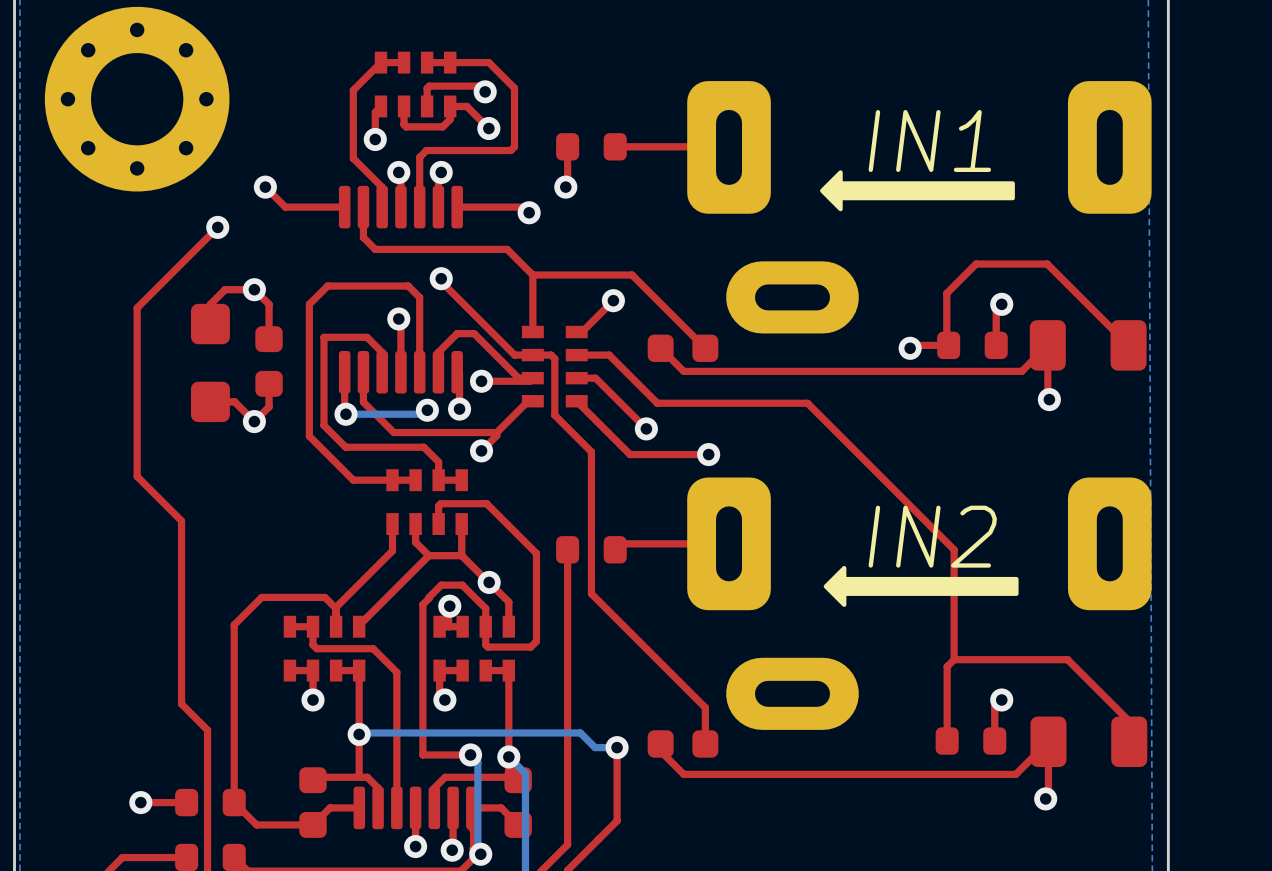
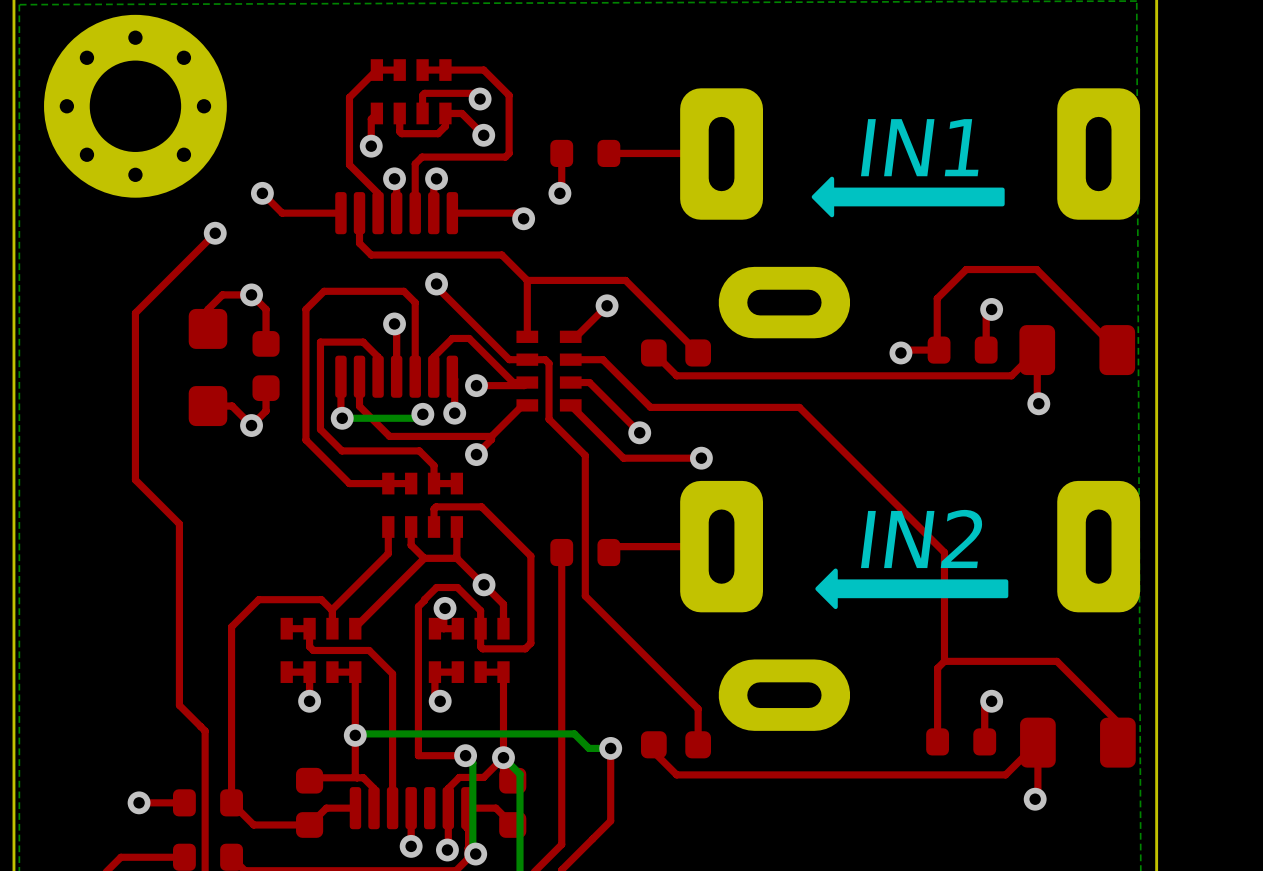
top track: none -> (503, 757) (483, 777) (459, 777) (448, 788) (448, 808)
top track: (515, 777) (445, 777) (434, 788) (434, 807) -> none

